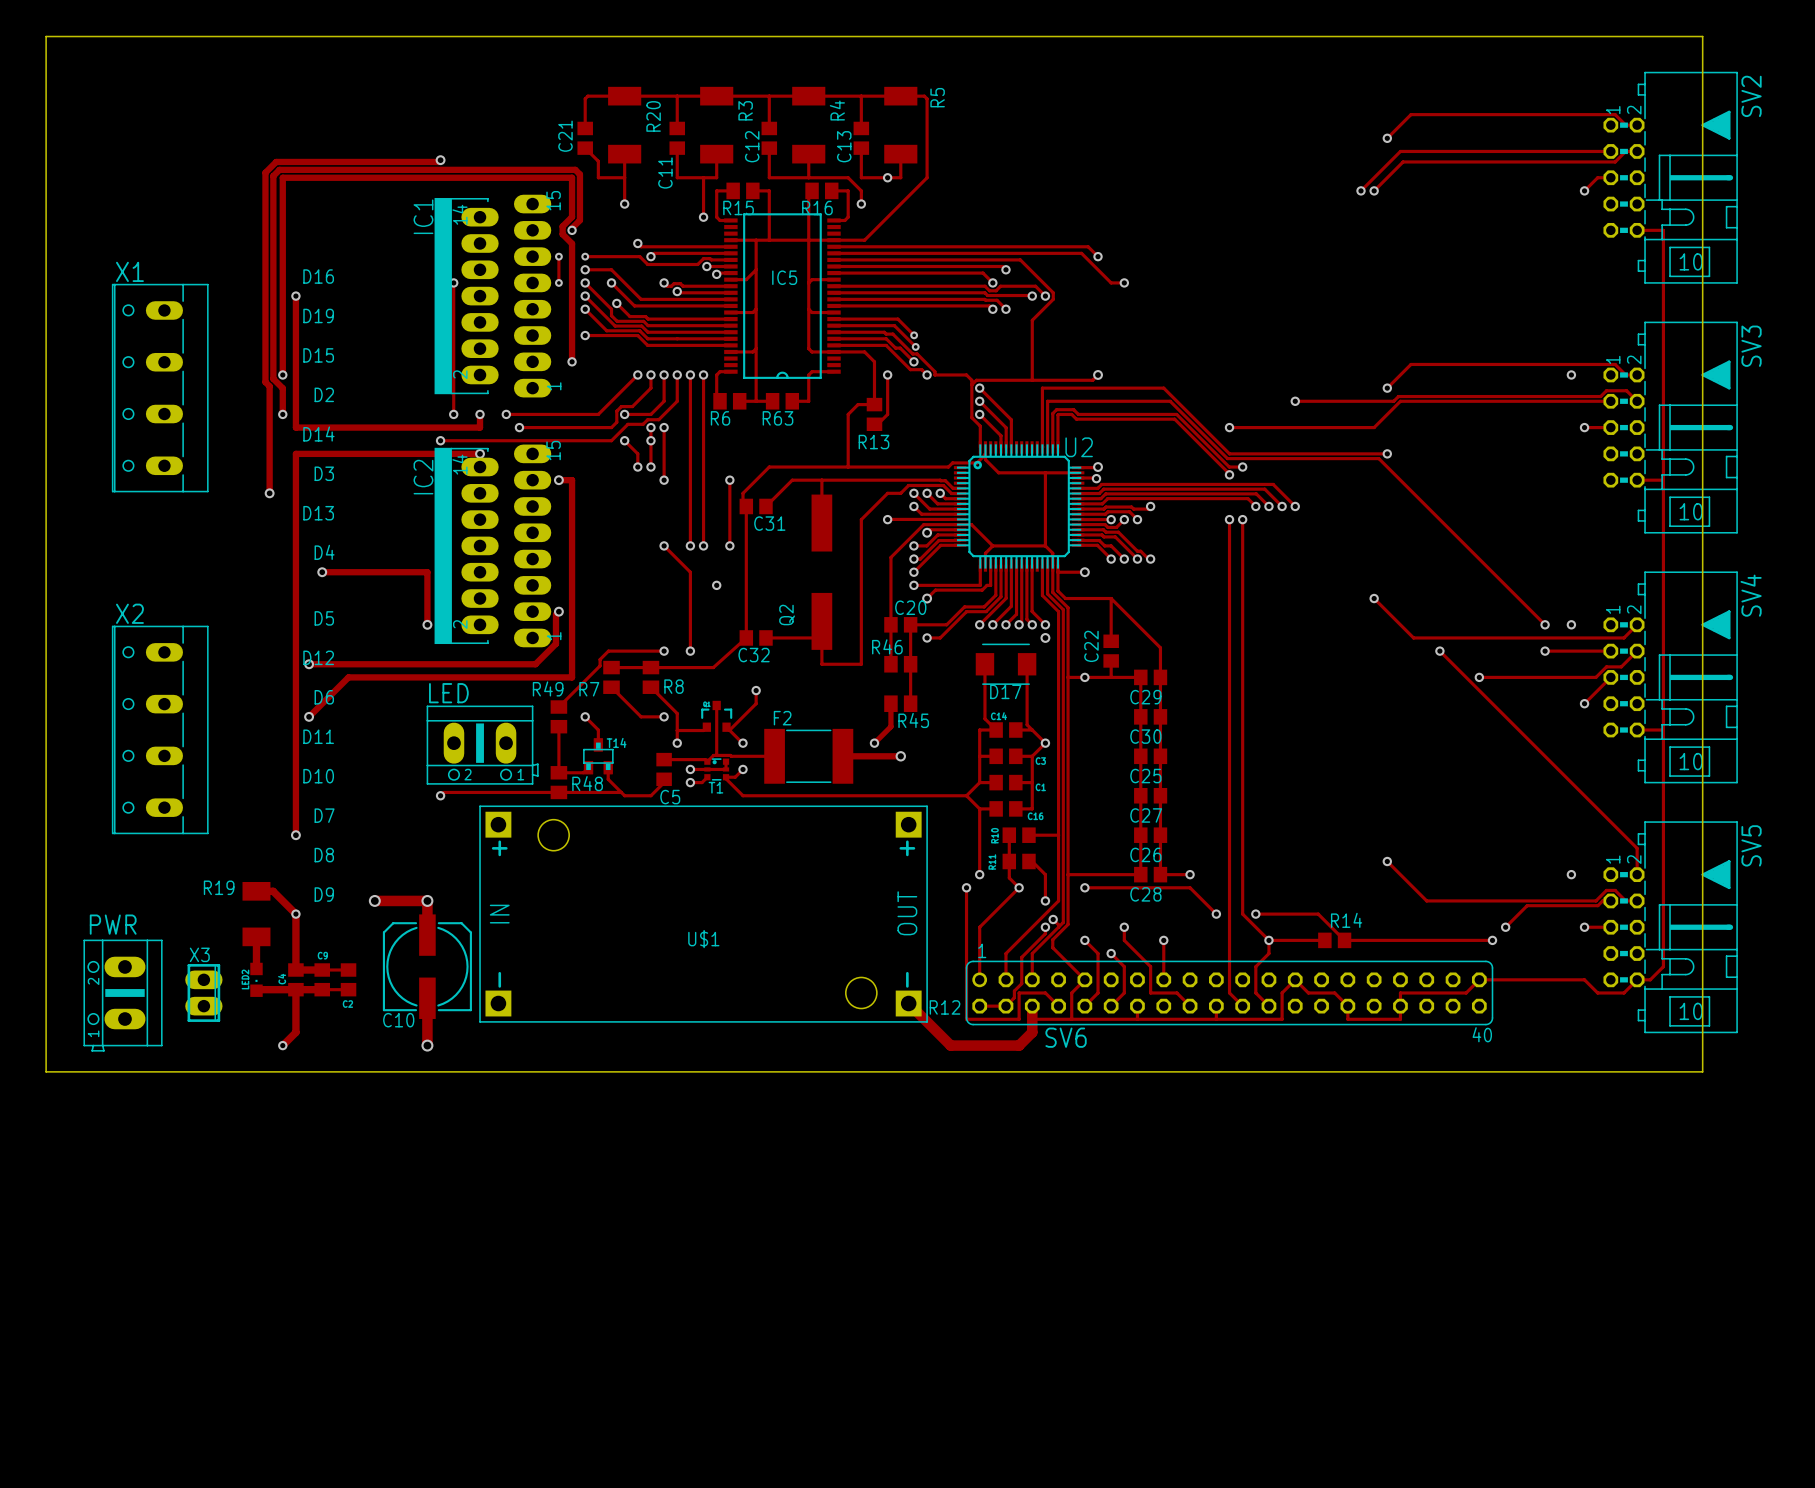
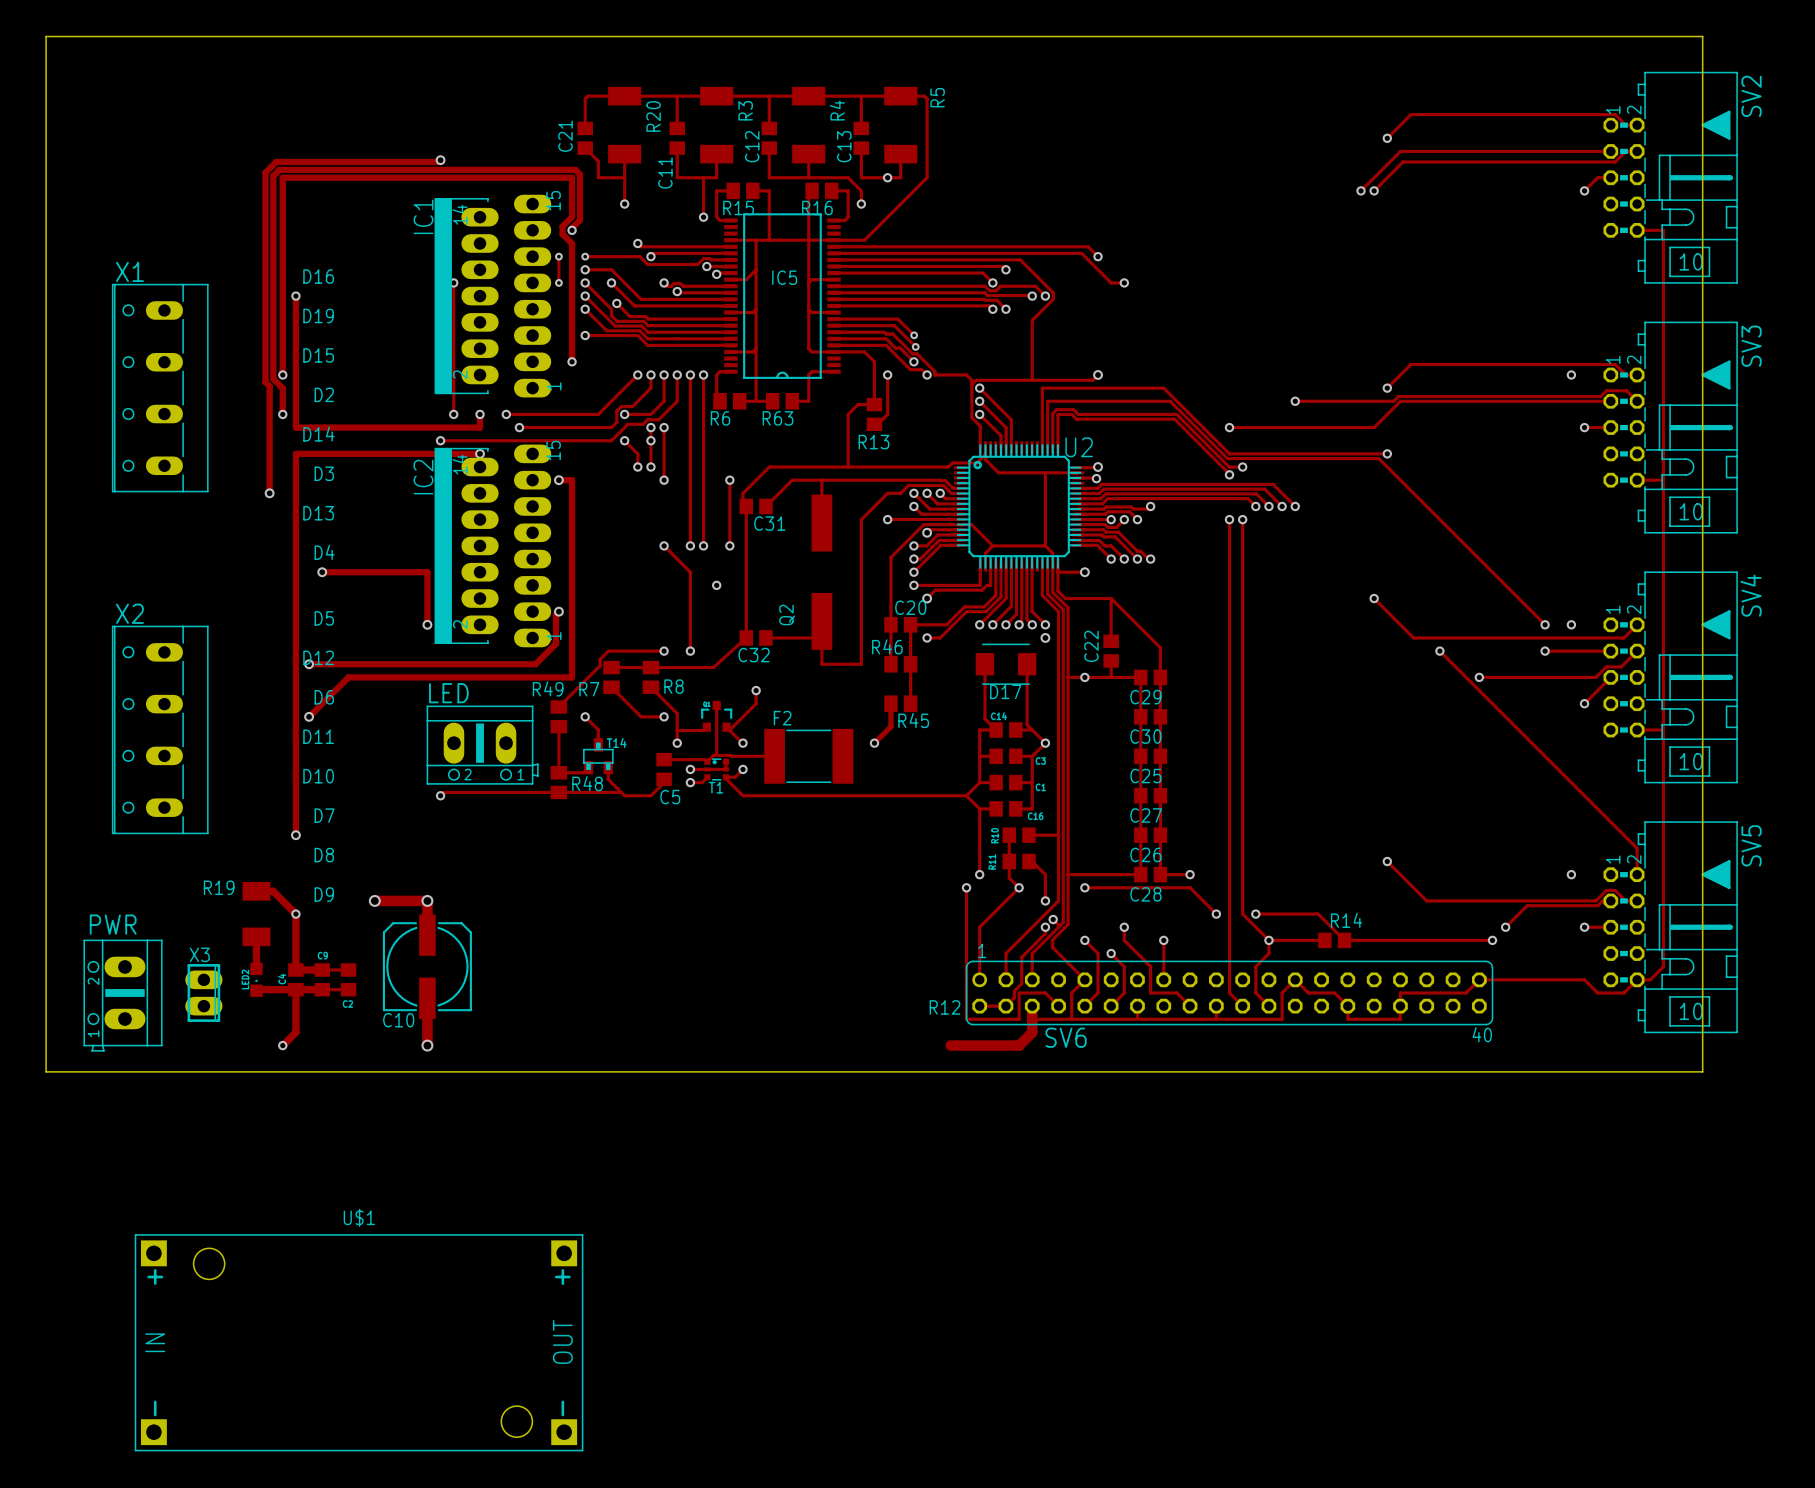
track: (842, 756) (900, 756) -> none
via: (900, 756) -> none
U$1 position: (703, 914) -> (359, 1342)
U$1 name position: U$1 (703, 939) -> U$1 (359, 1217)
track: (908, 1003) (950, 1045) -> none

